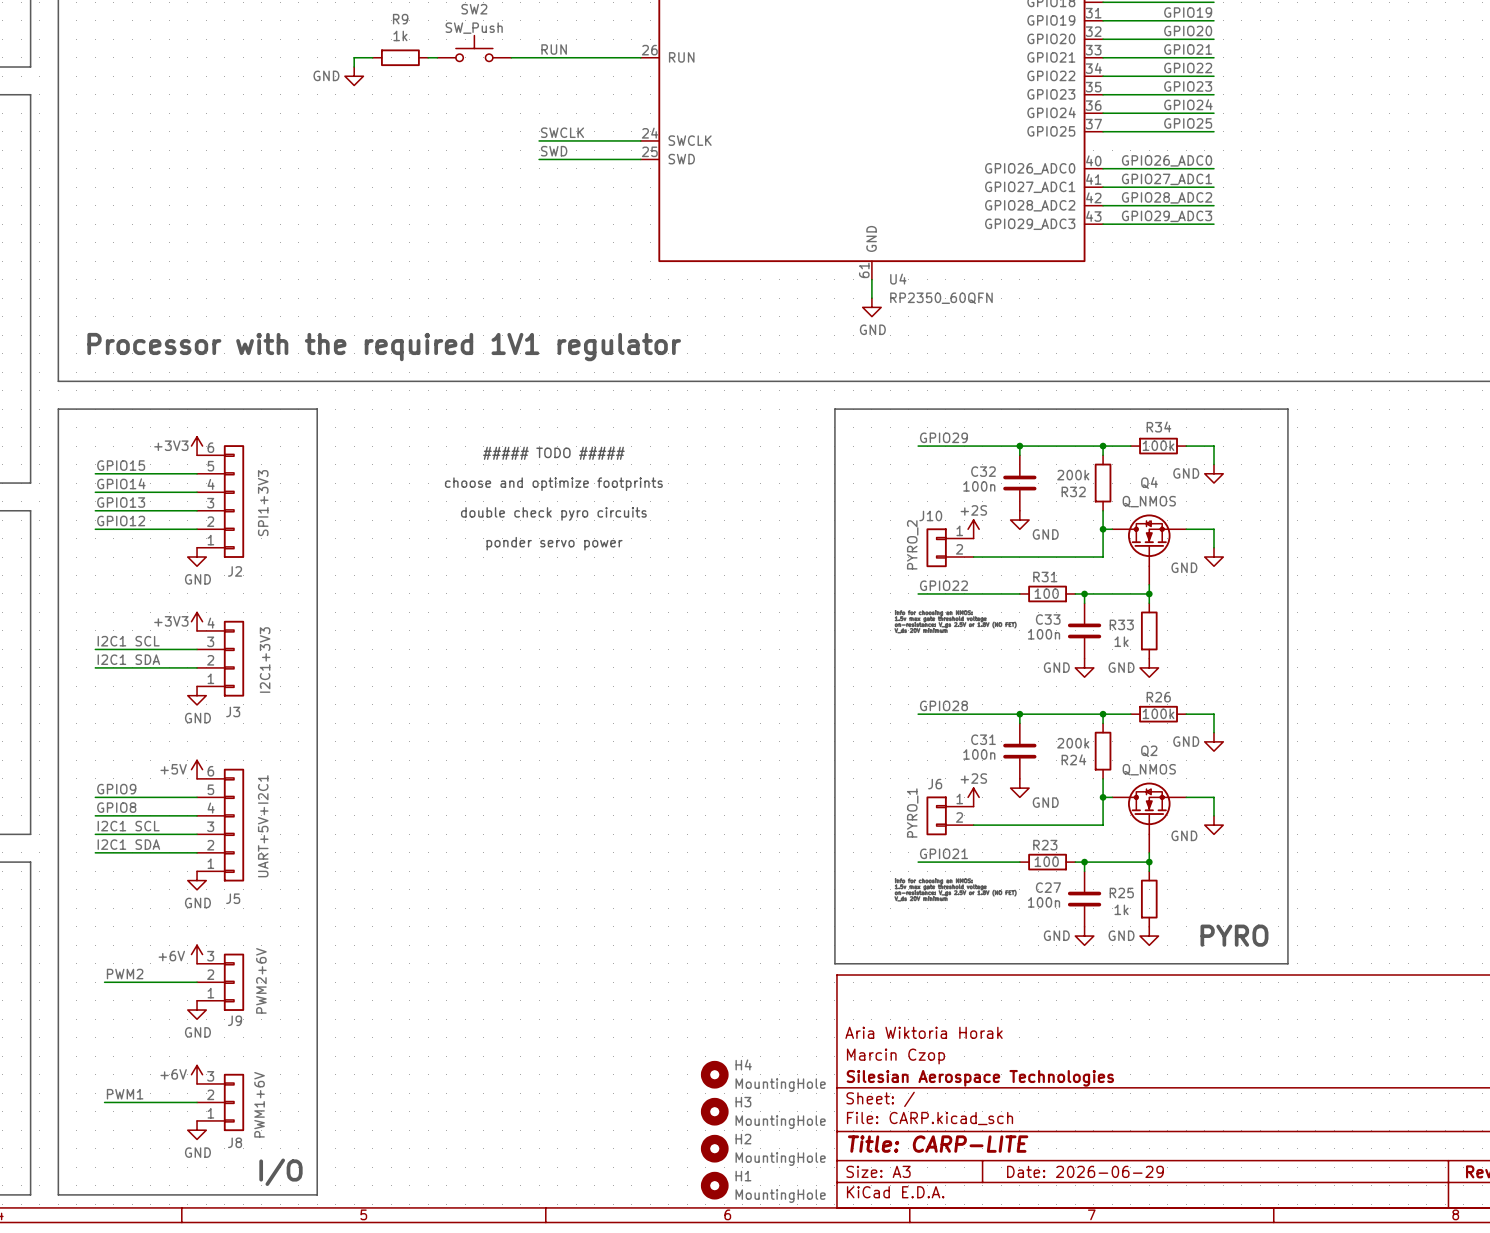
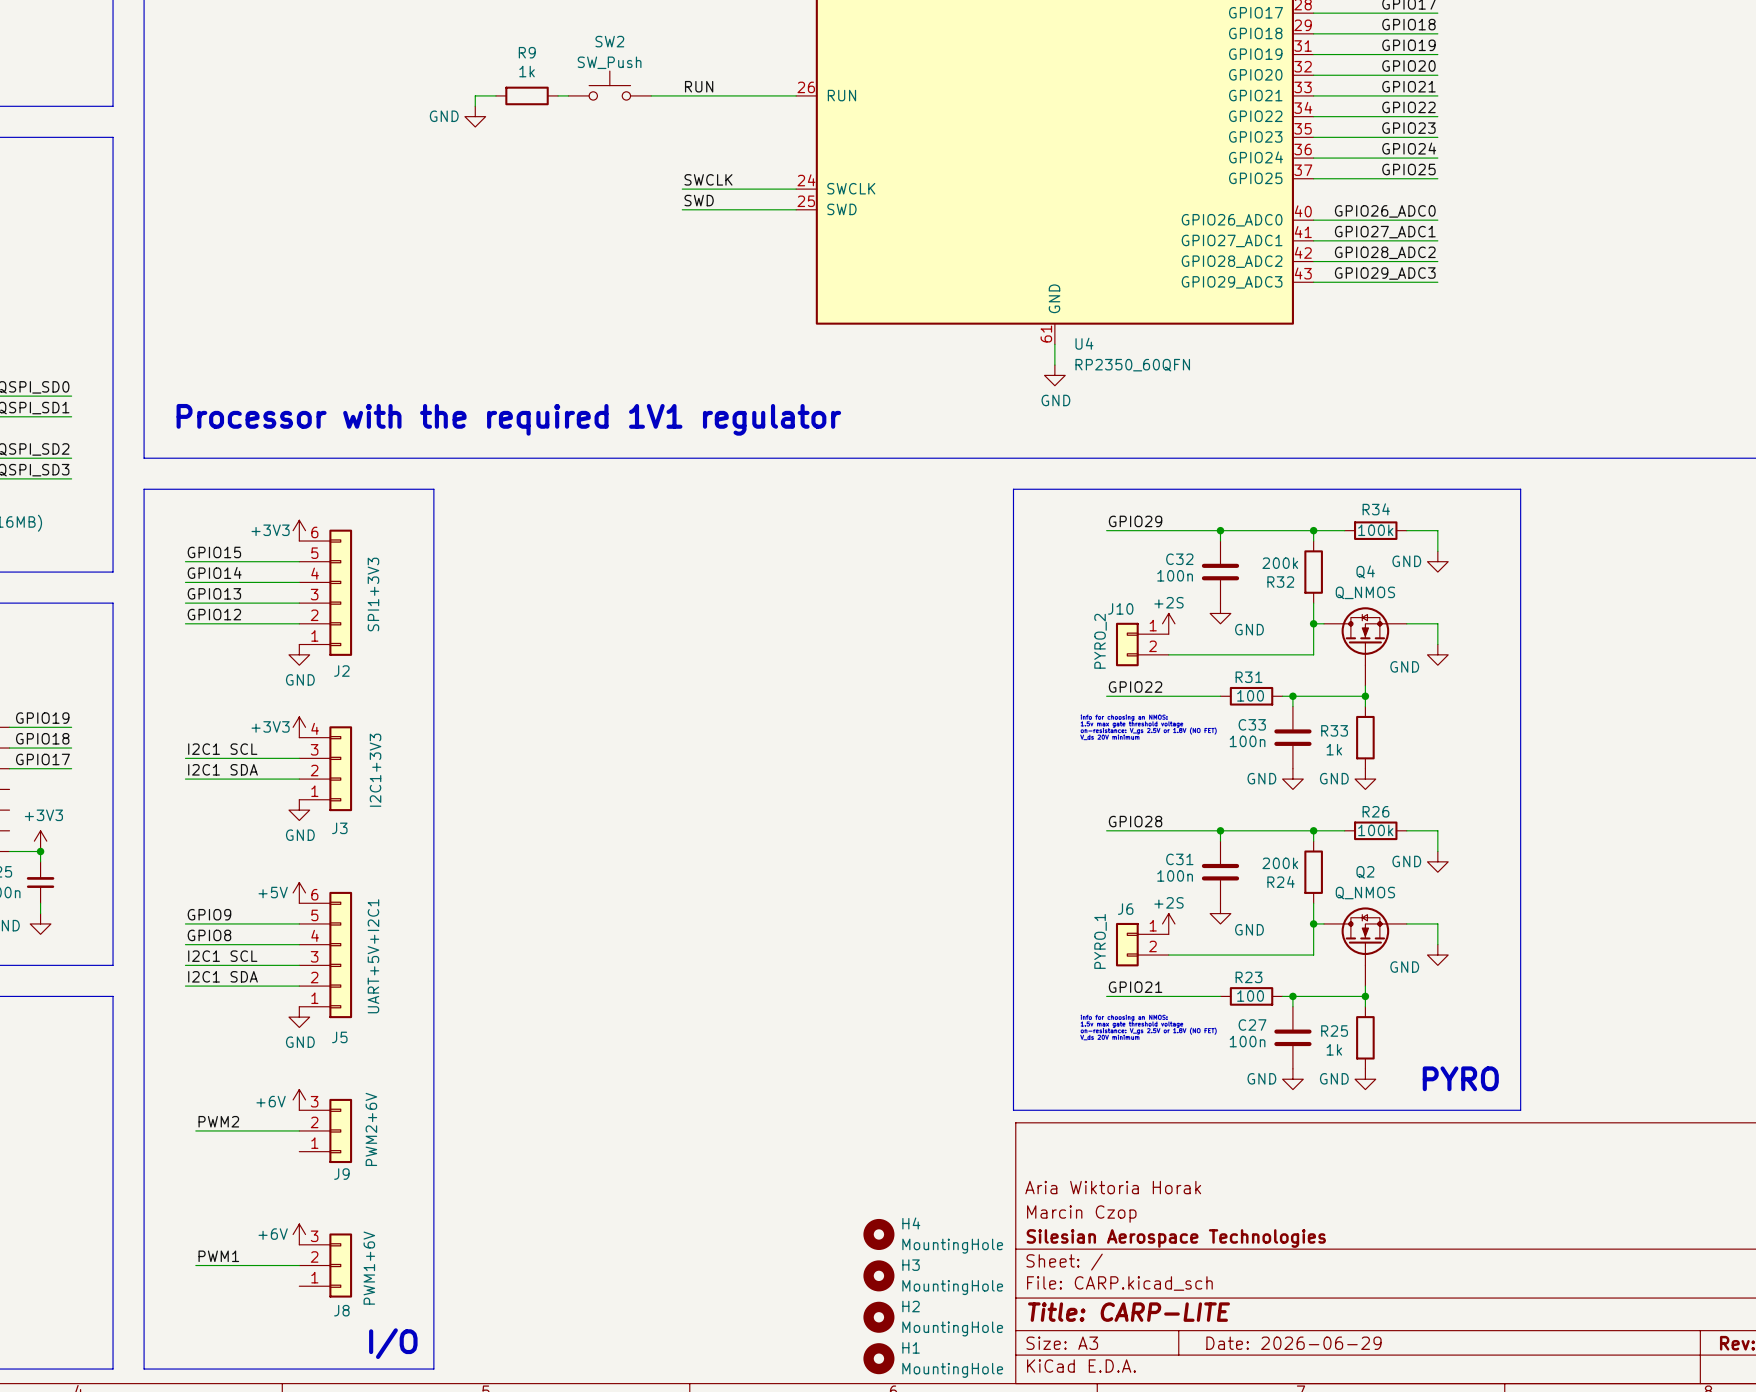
text: ##### TODO ##### (553, 453) -> none
text: choose and optimize footprints (553, 484) -> none
text: double check pyro circuits (553, 513) -> none
text: ponder servo power (554, 543) -> none
power symbol: GND (197, 1010) -> none
power symbol: GND (197, 1130) -> none

